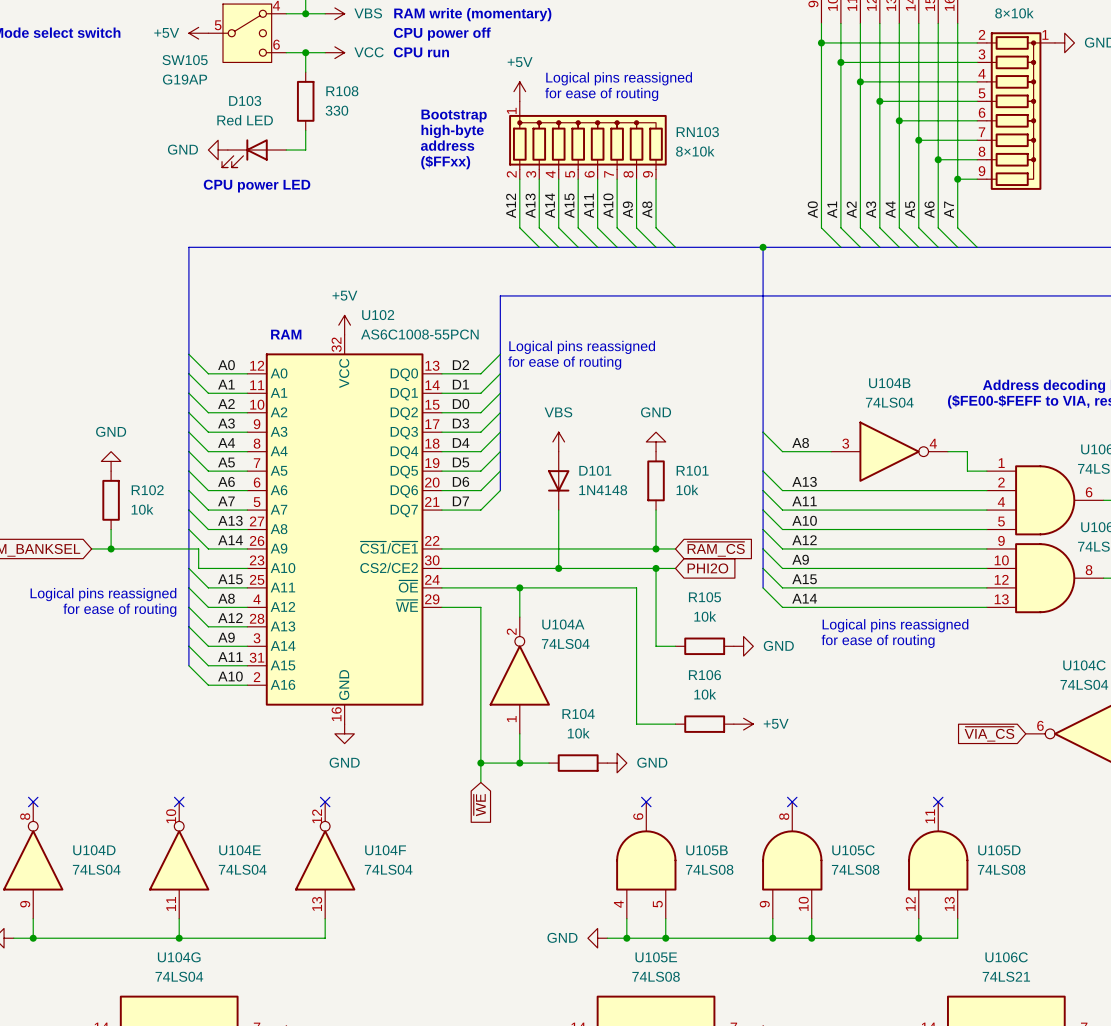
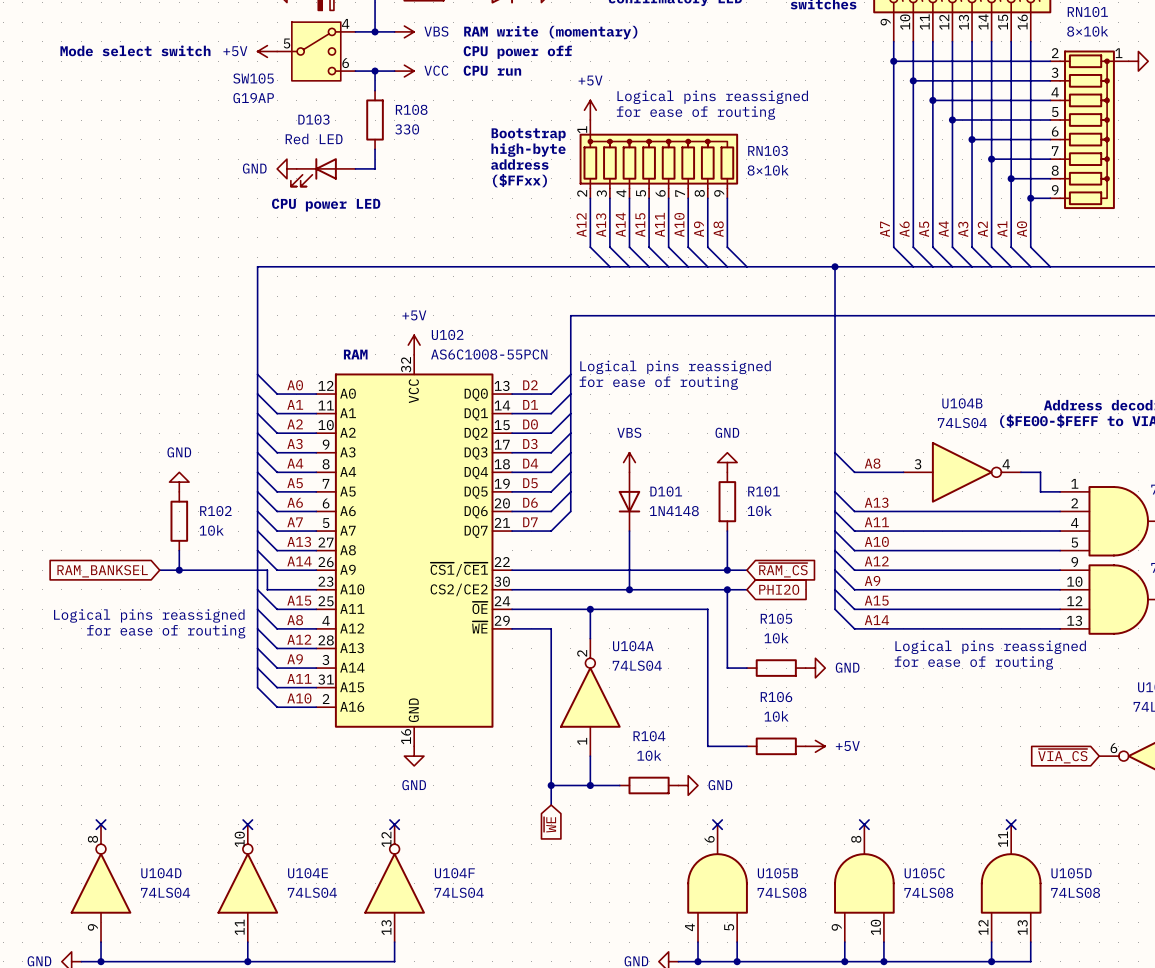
label: A0 (812, 209) -> A7 (885, 229)
label: A1 (832, 209) -> A6 (904, 229)
label: A2 (851, 209) -> A5 (924, 229)
label: A3 (871, 209) -> A4 (943, 229)
label: A4 (890, 209) -> A3 (963, 229)
label: A5 (910, 209) -> A2 (982, 229)
label: A6 (929, 209) -> A1 (1002, 229)
label: A7 (949, 209) -> A0 (1022, 229)

